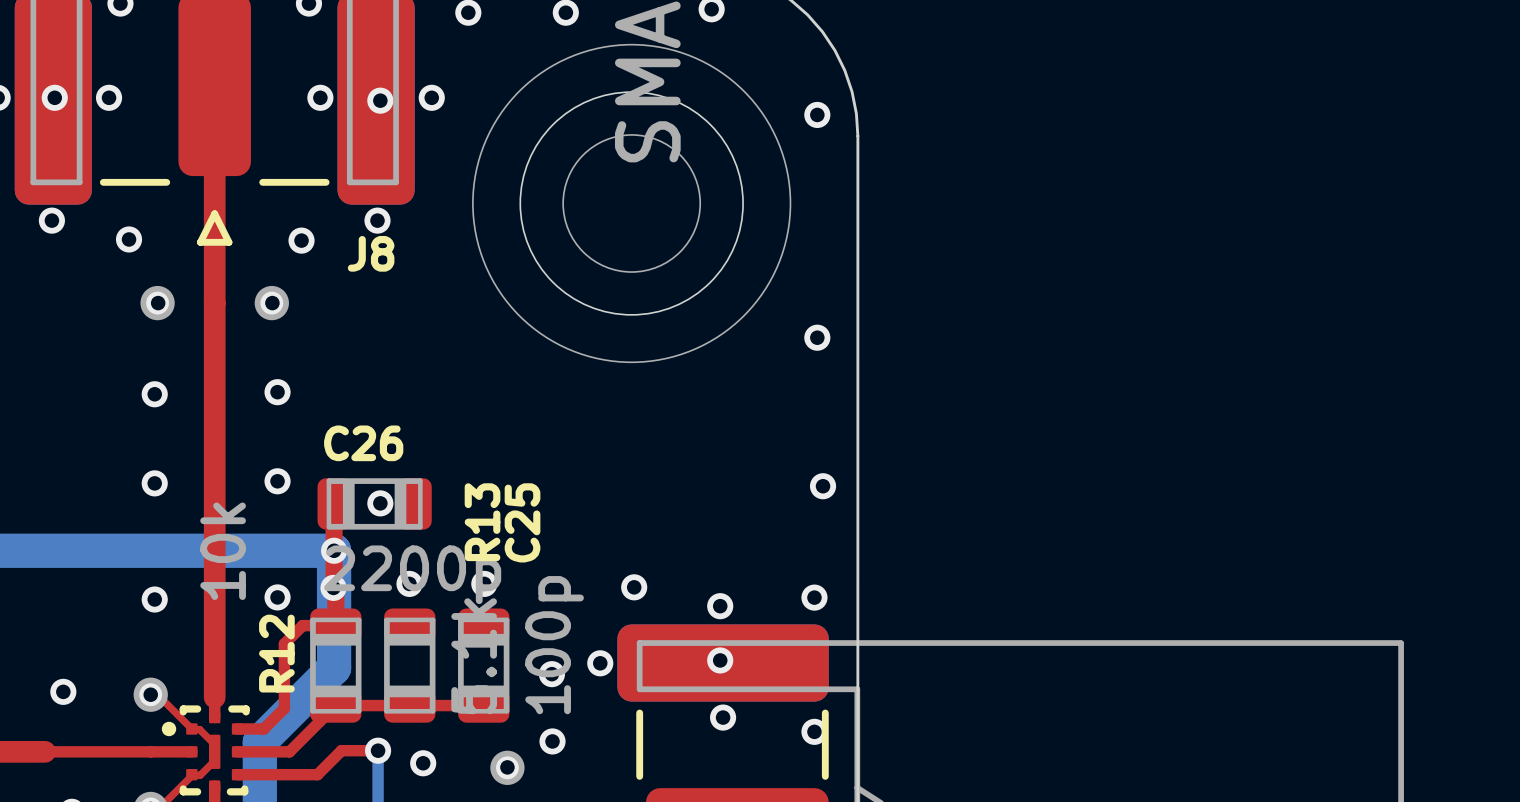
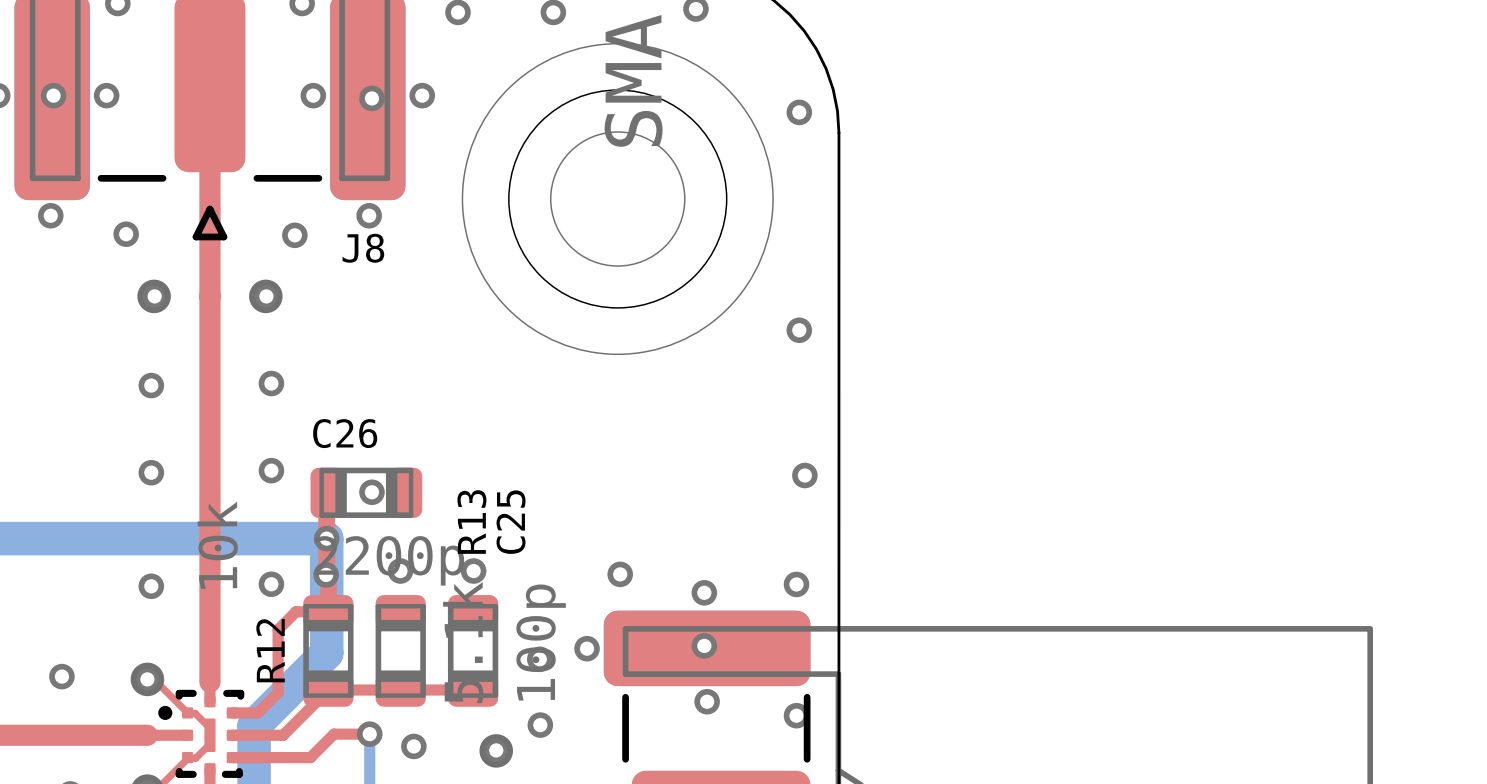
top track width: thin (45, 751) (150, 751) -> thick (44, 735) (147, 735)

